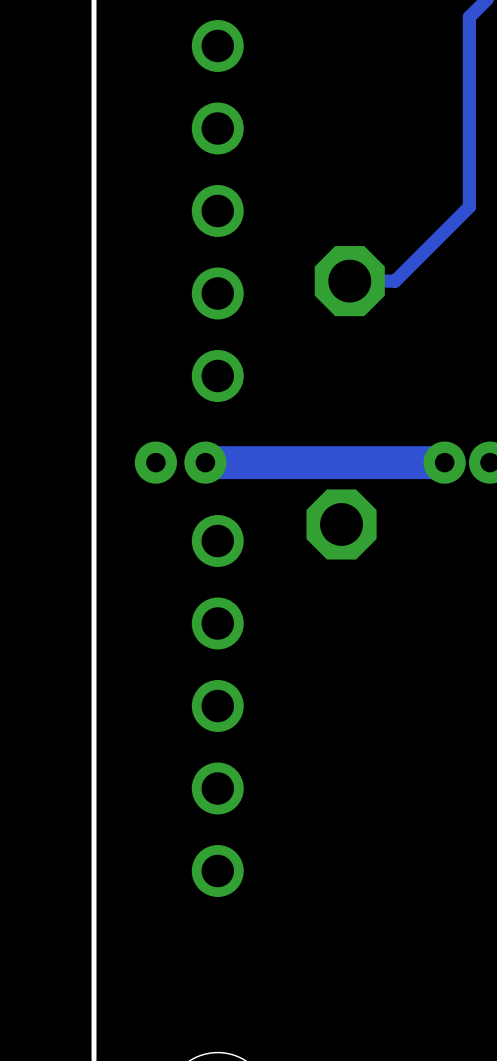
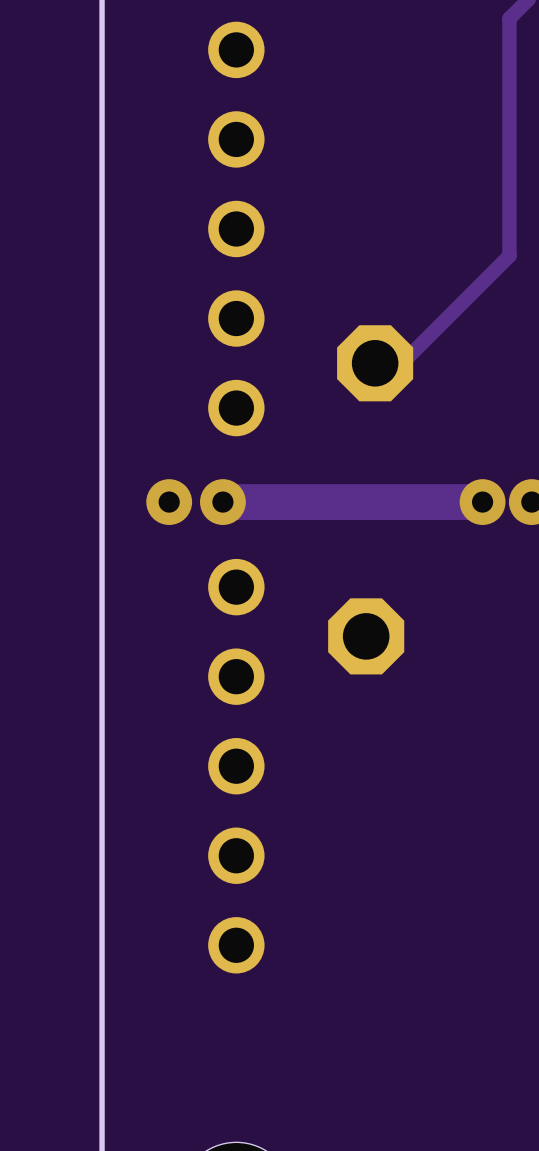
track: (469, 206) (395, 281) (349, 281) -> (509, 224) (509, 255) (402, 363) (375, 363)
part position: (349, 281) -> (375, 363)
part position: (341, 524) -> (366, 636)

